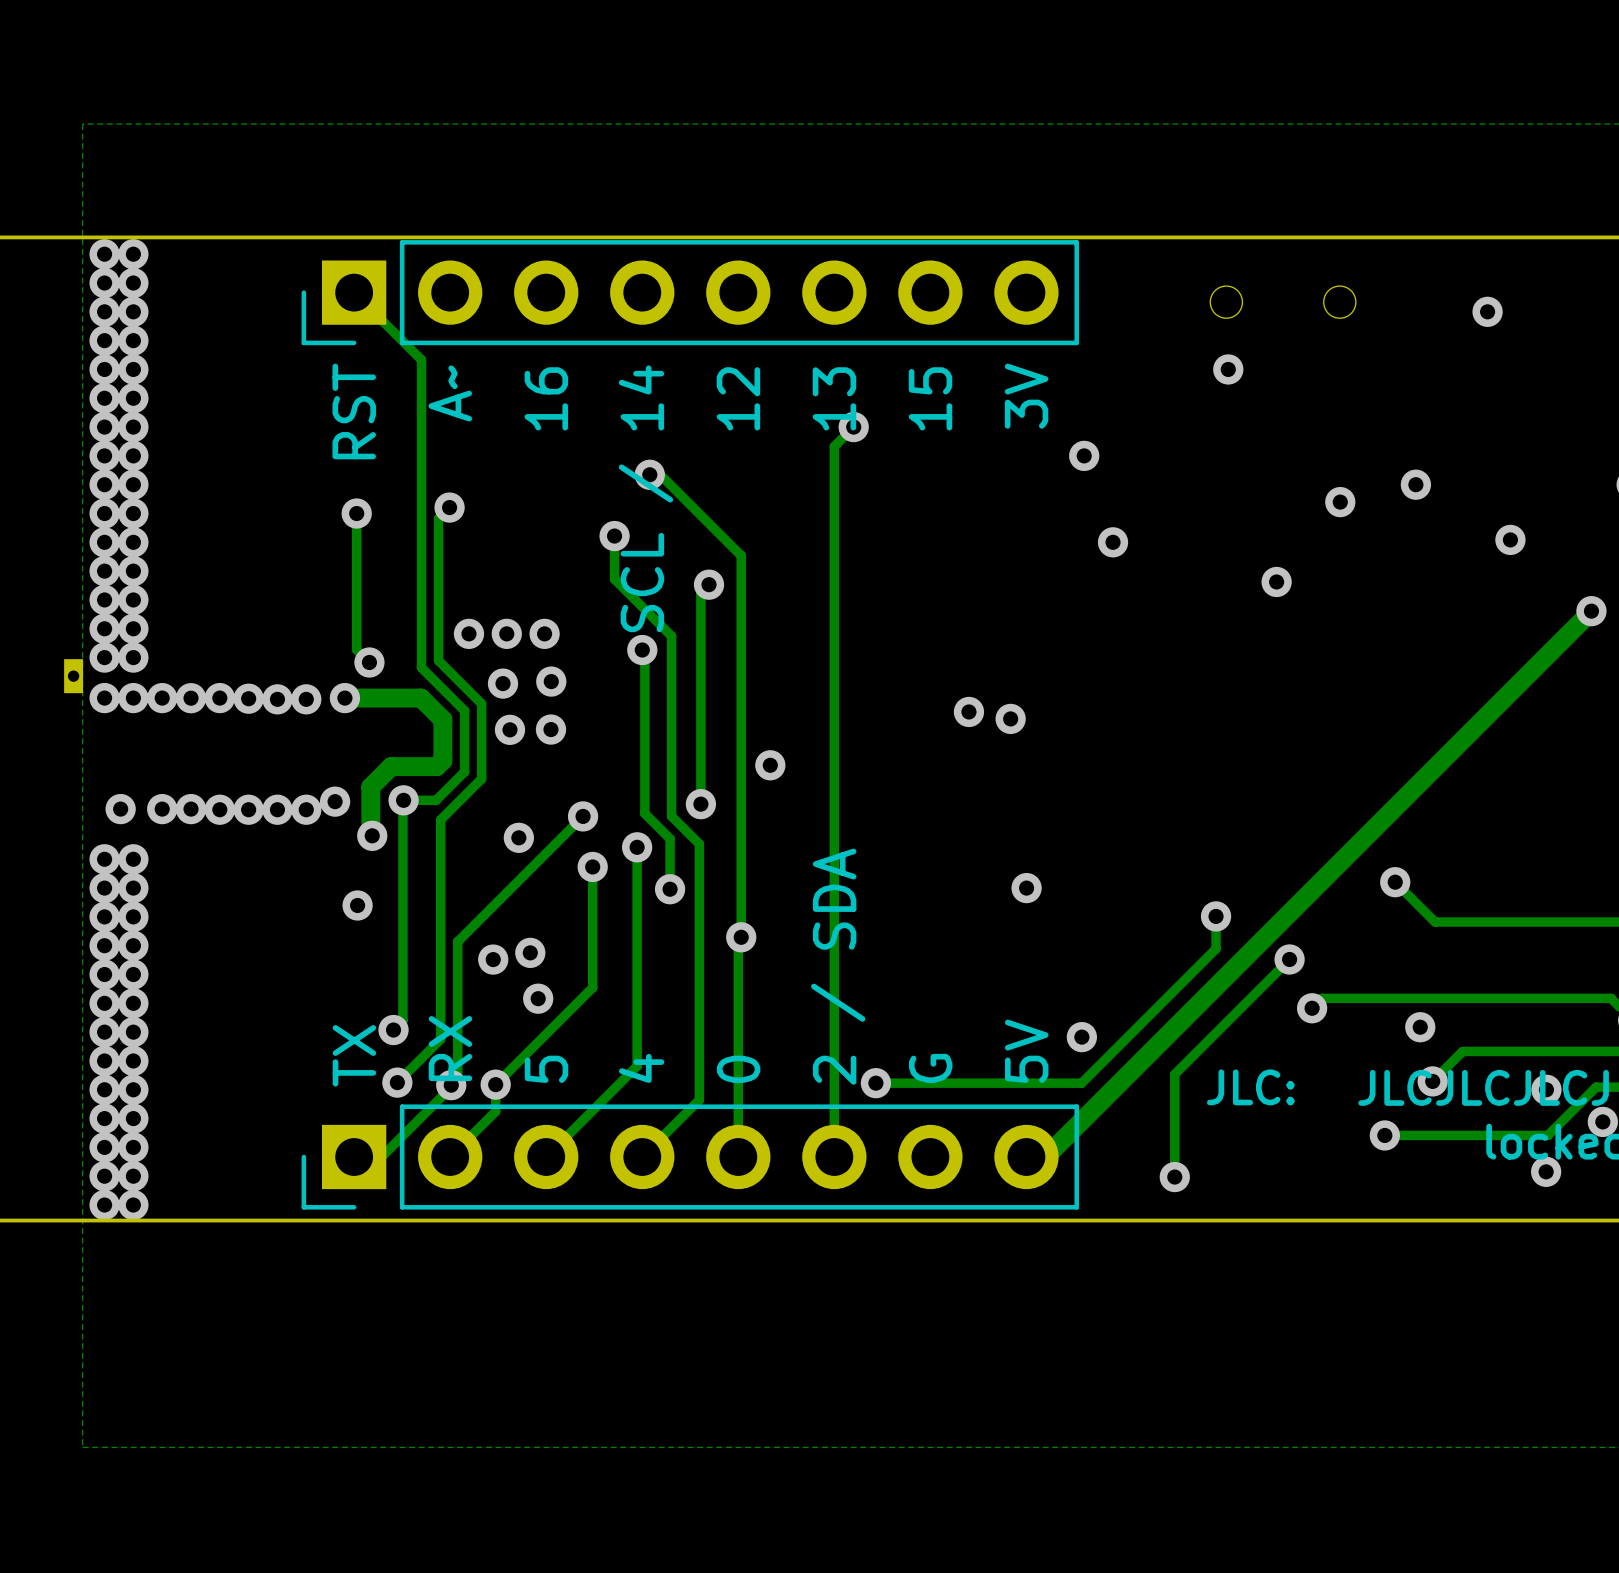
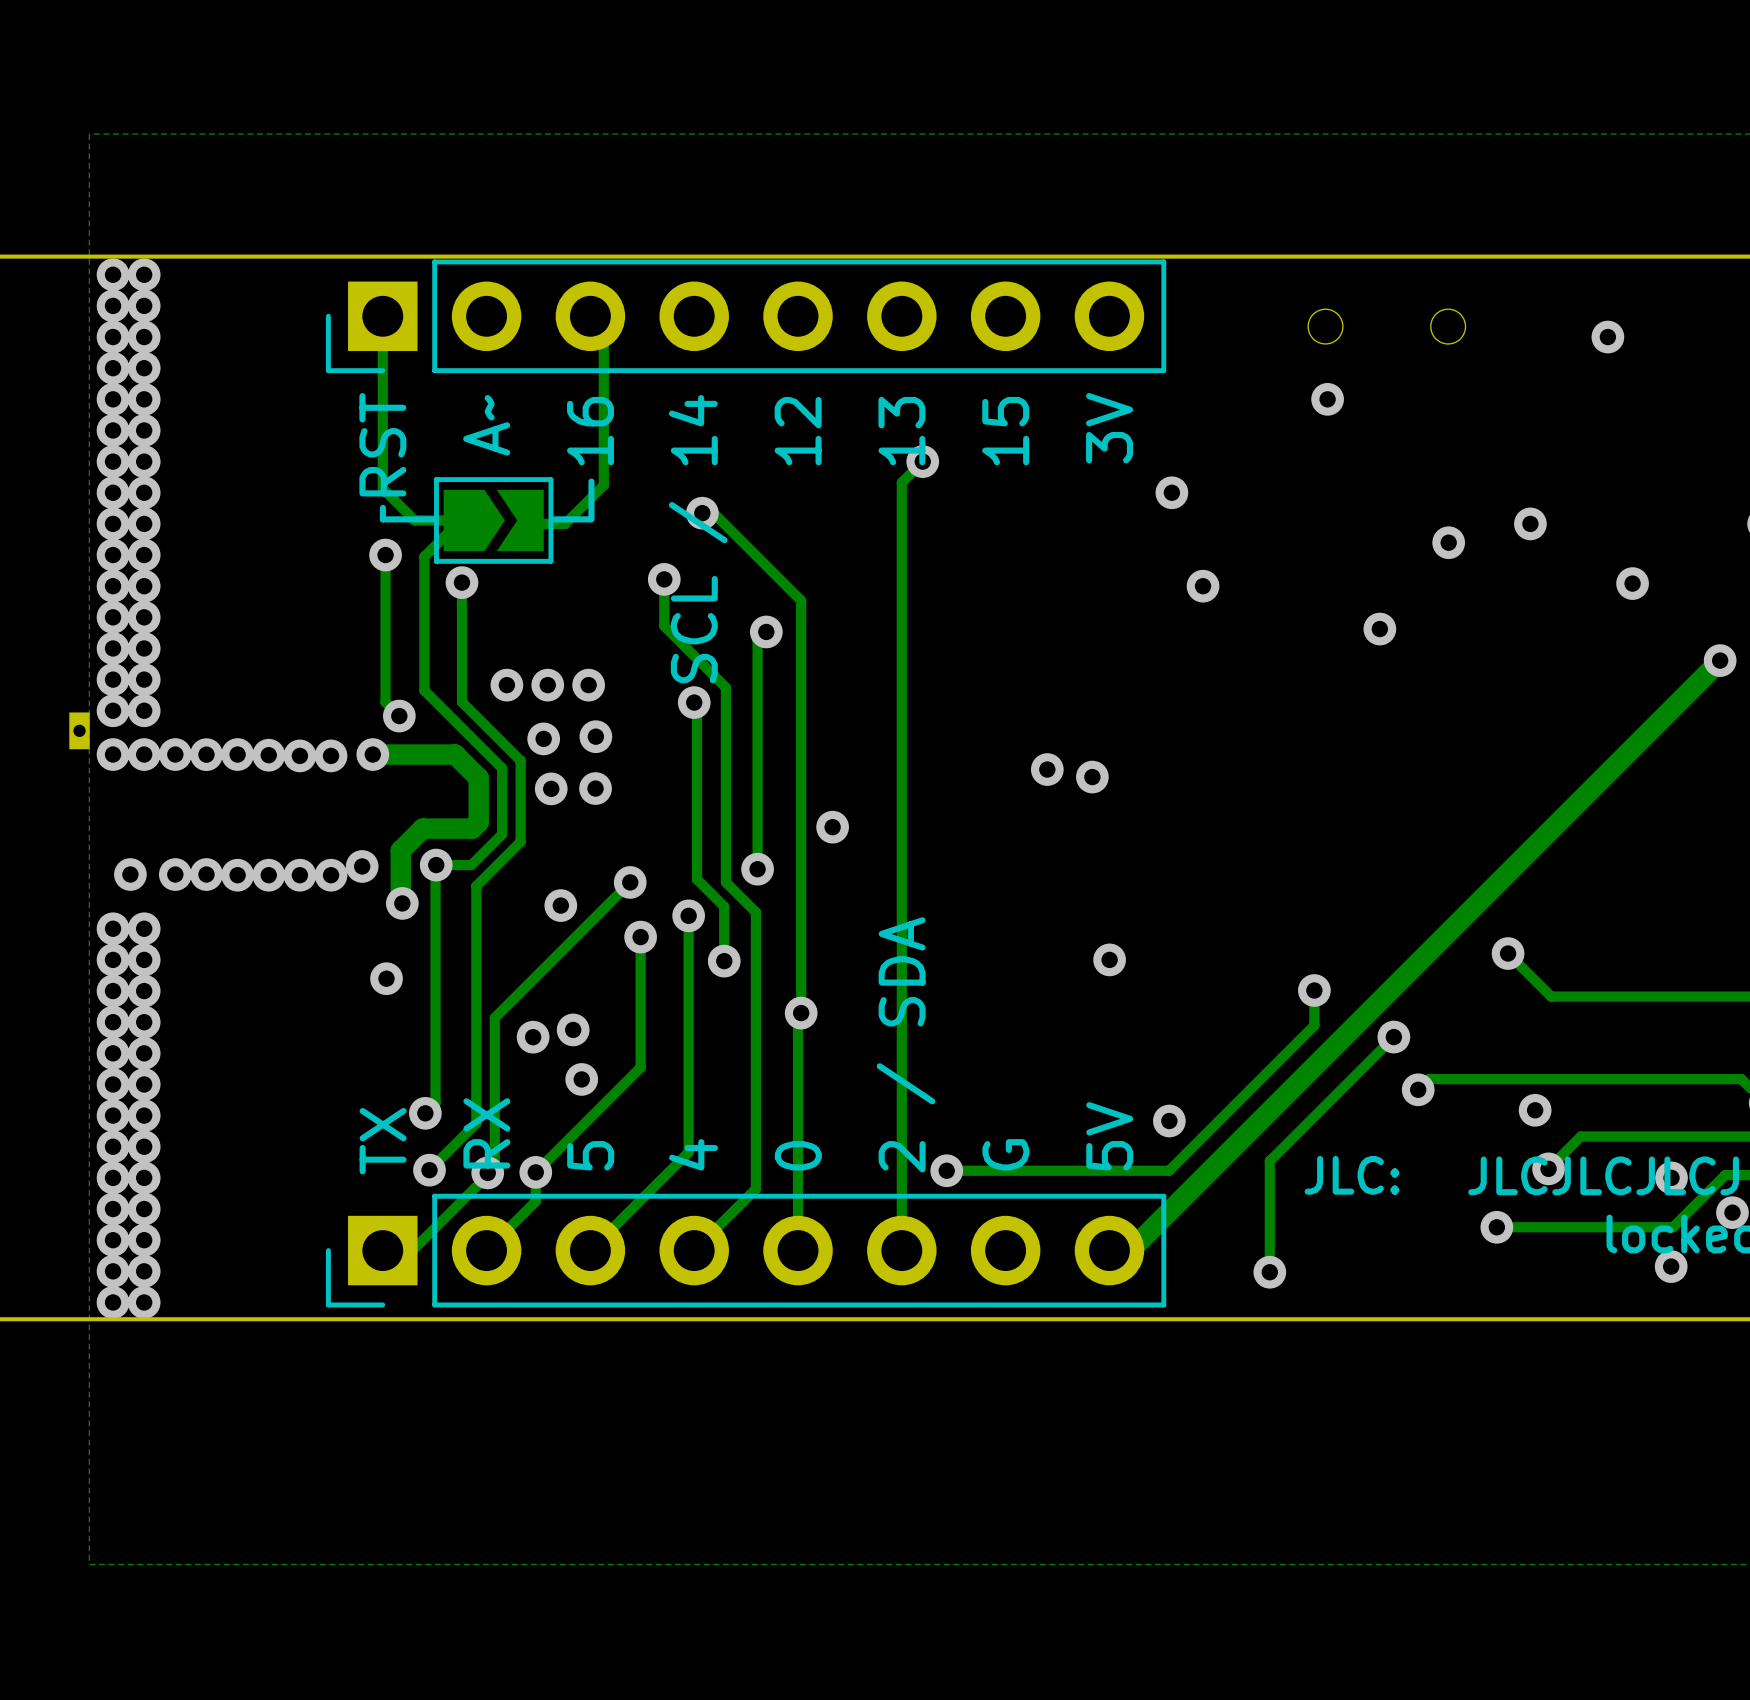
track: (354, 292) (421, 360) (421, 667) -> (382, 316) (382, 488) (414, 520) (464, 520)
track: none -> (590, 316) (603, 329) (603, 485) (565, 523) (526, 523) (523, 520)
line: none -> (591, 481) (591, 519)
line: none -> (382, 507) (382, 519) (434, 519)
line: none -> (590, 519) (554, 519)
track: none -> (460, 520) (424, 556) (424, 690) (455, 721)
part: none -> (493, 520)
track: (449, 507) (438, 518) (438, 660) -> (461, 582) (461, 702) (474, 714)
via position: (449, 507) -> (461, 582)

